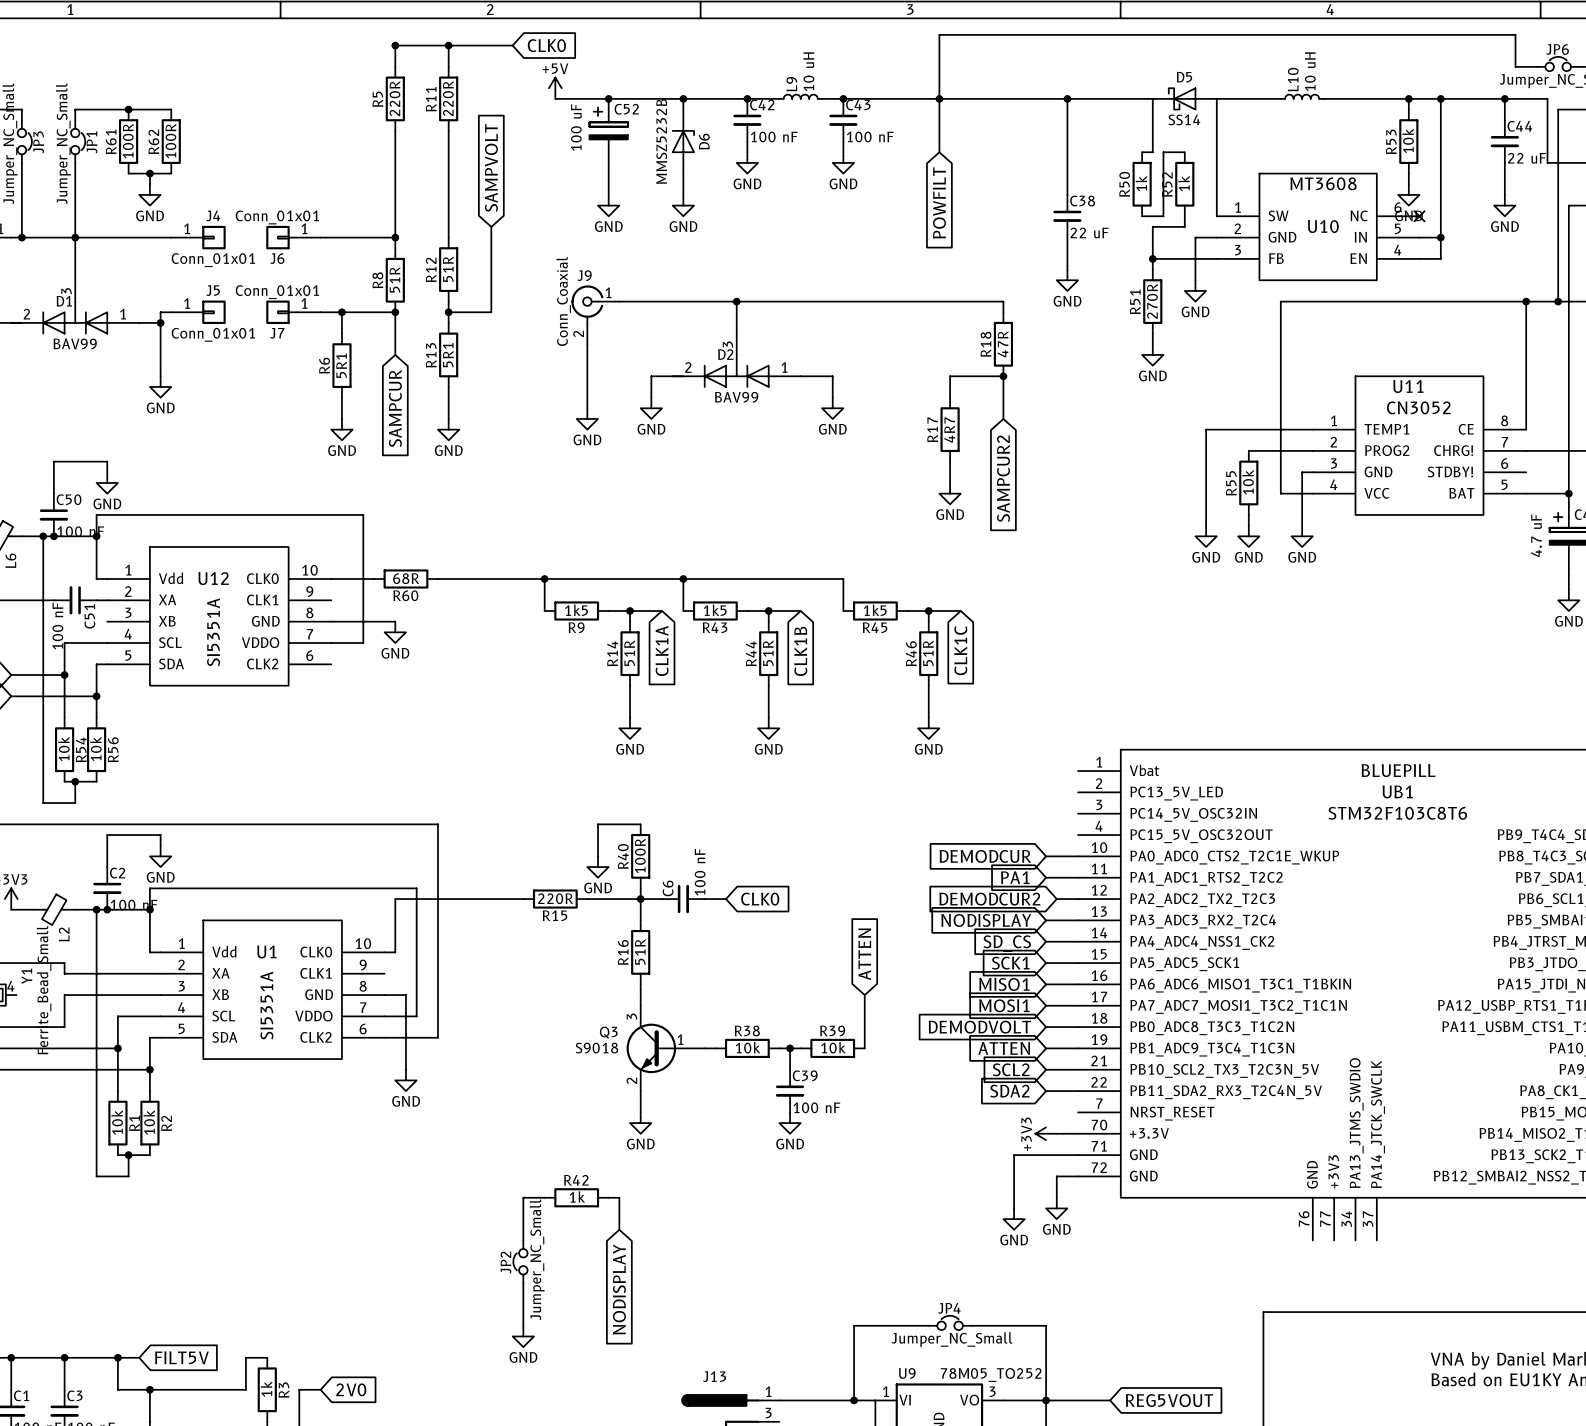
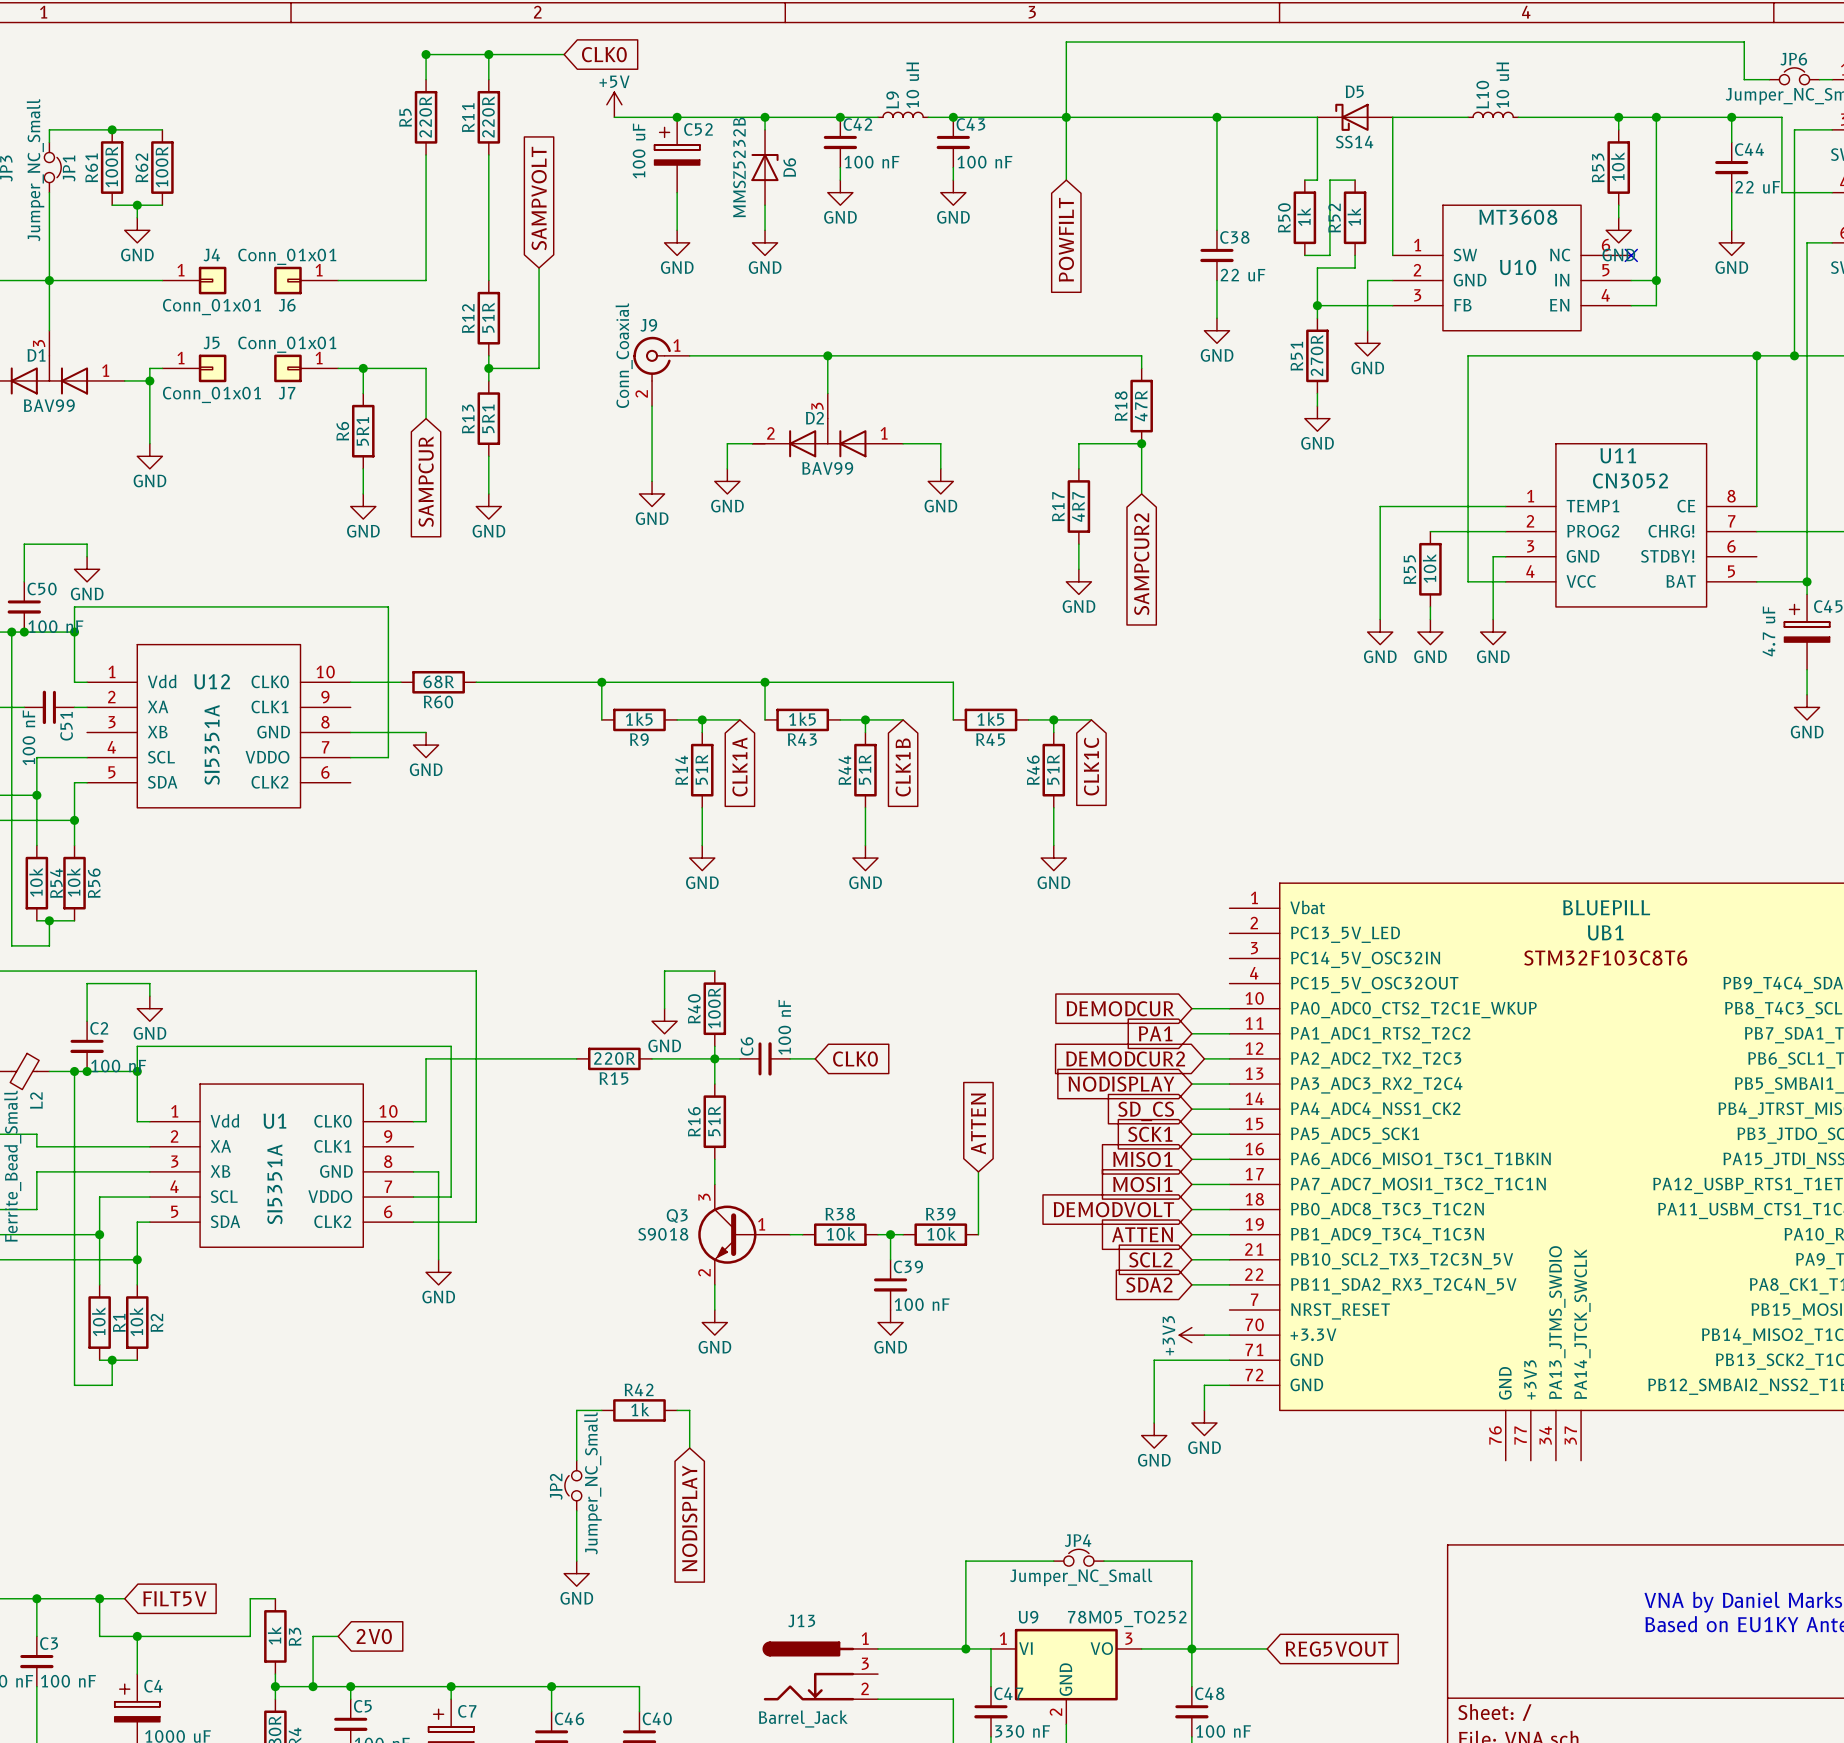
wire: (395, 237) (395, 248) -> none
junction: (395, 237) -> none
R8: 51R (395, 280) -> none
junction: (395, 312) -> none

